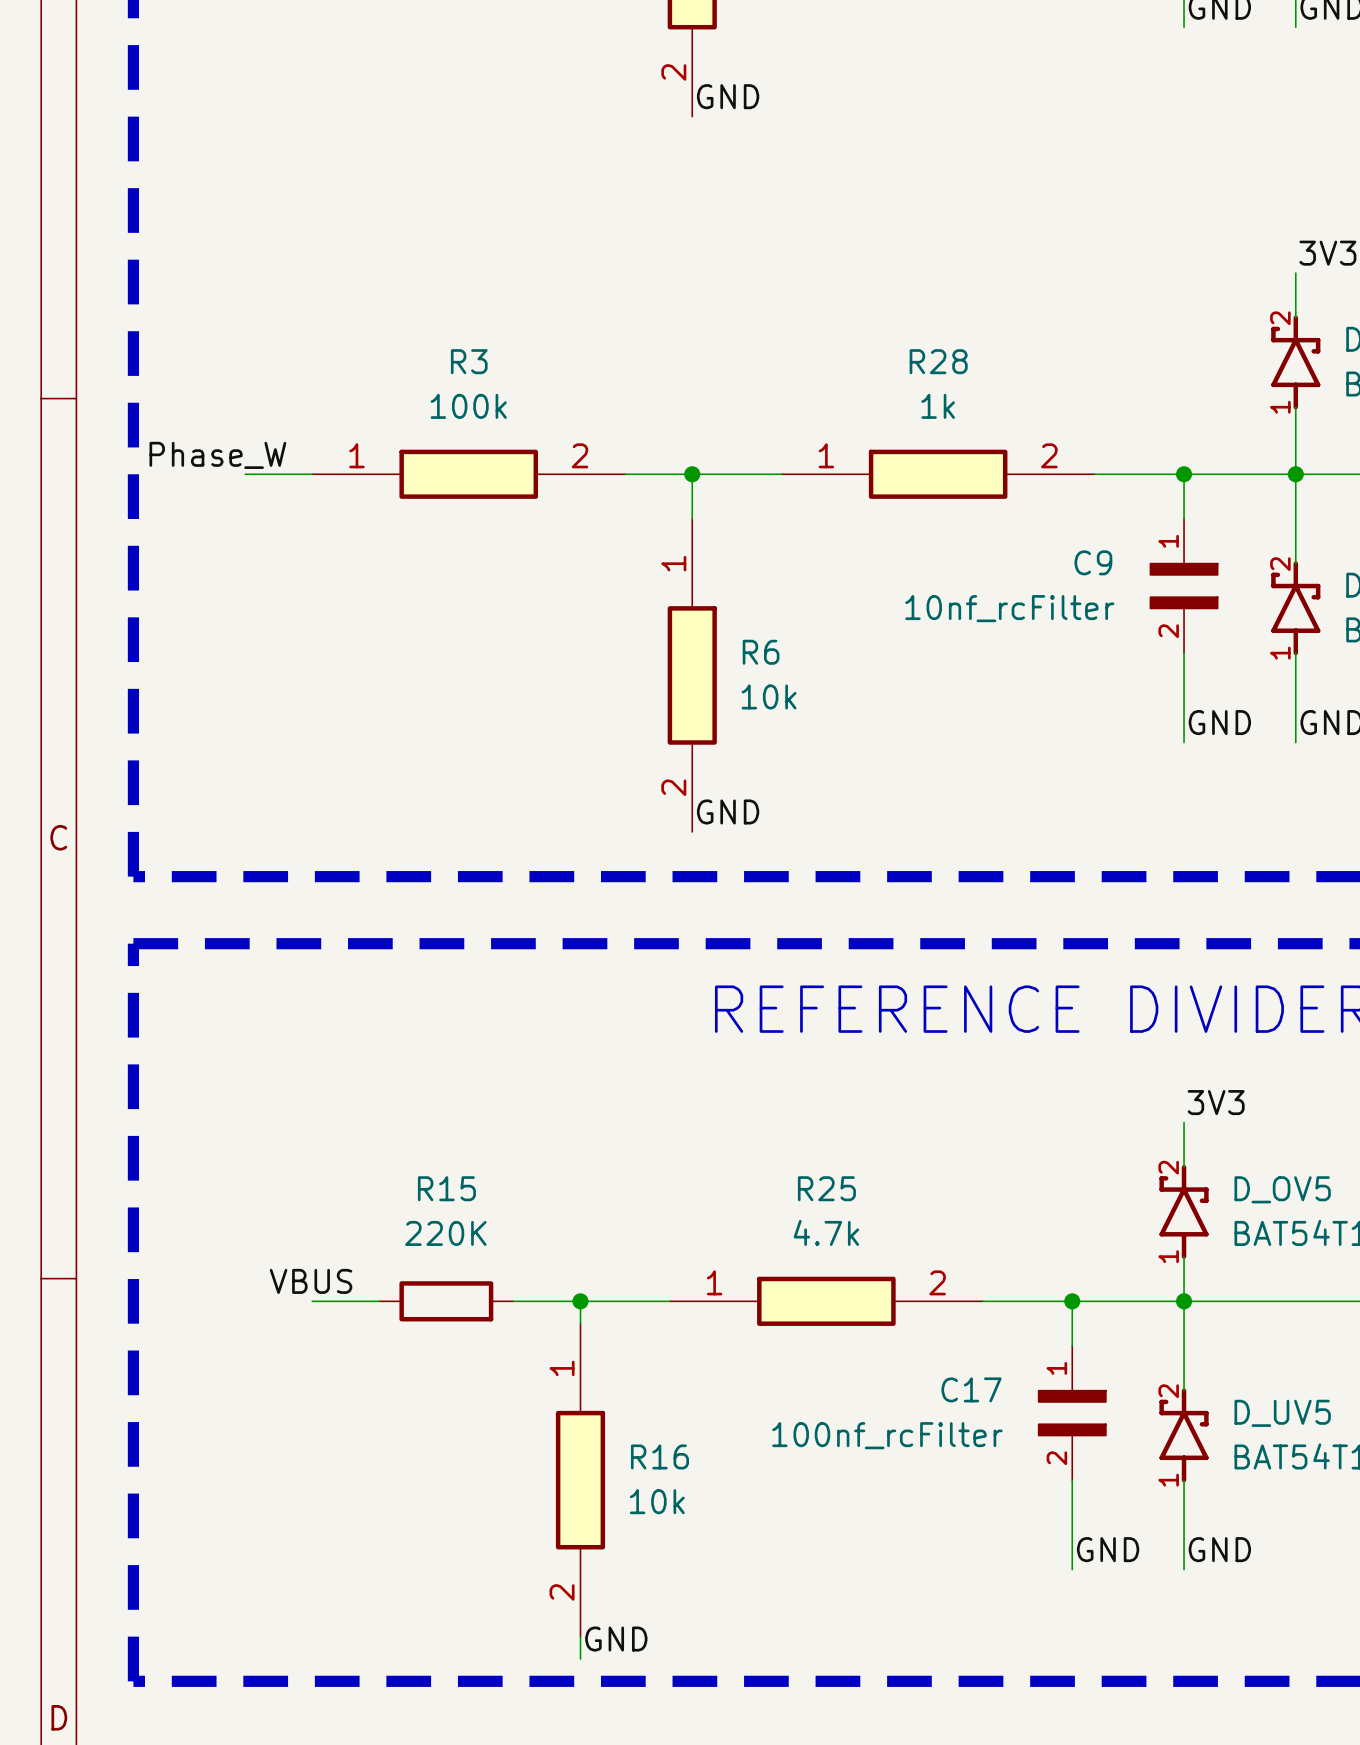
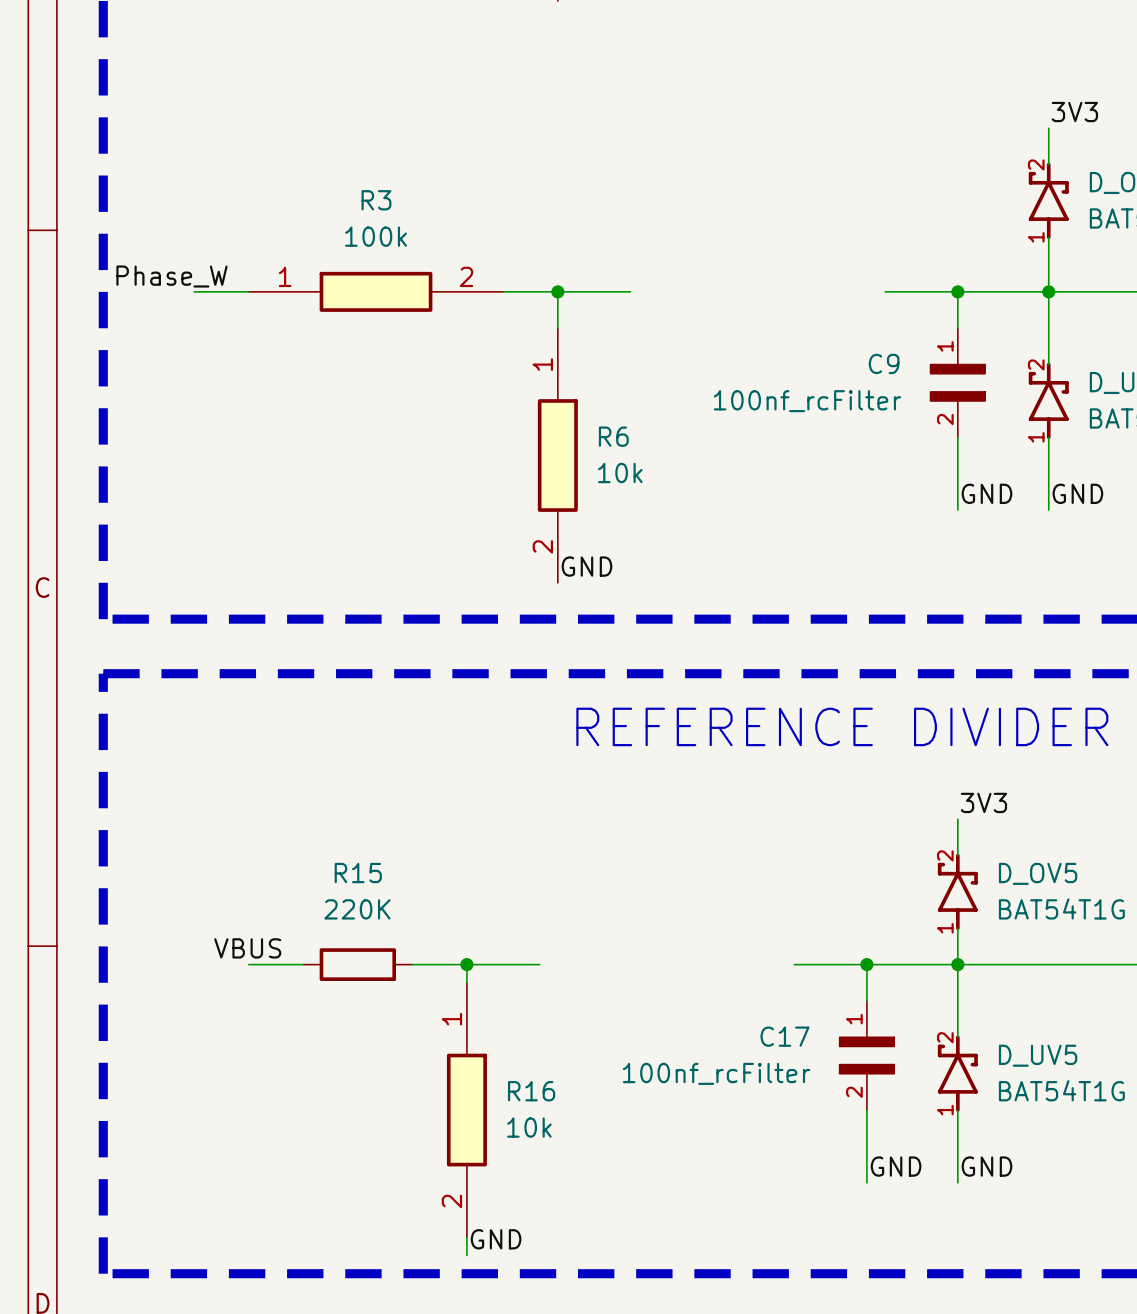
R28: 1k (938, 474) -> none
C9 value: 10nf_rcFilter (1009, 608) -> 100nf_rcFilter (807, 401)
R25: 4.7k (826, 1301) -> none

